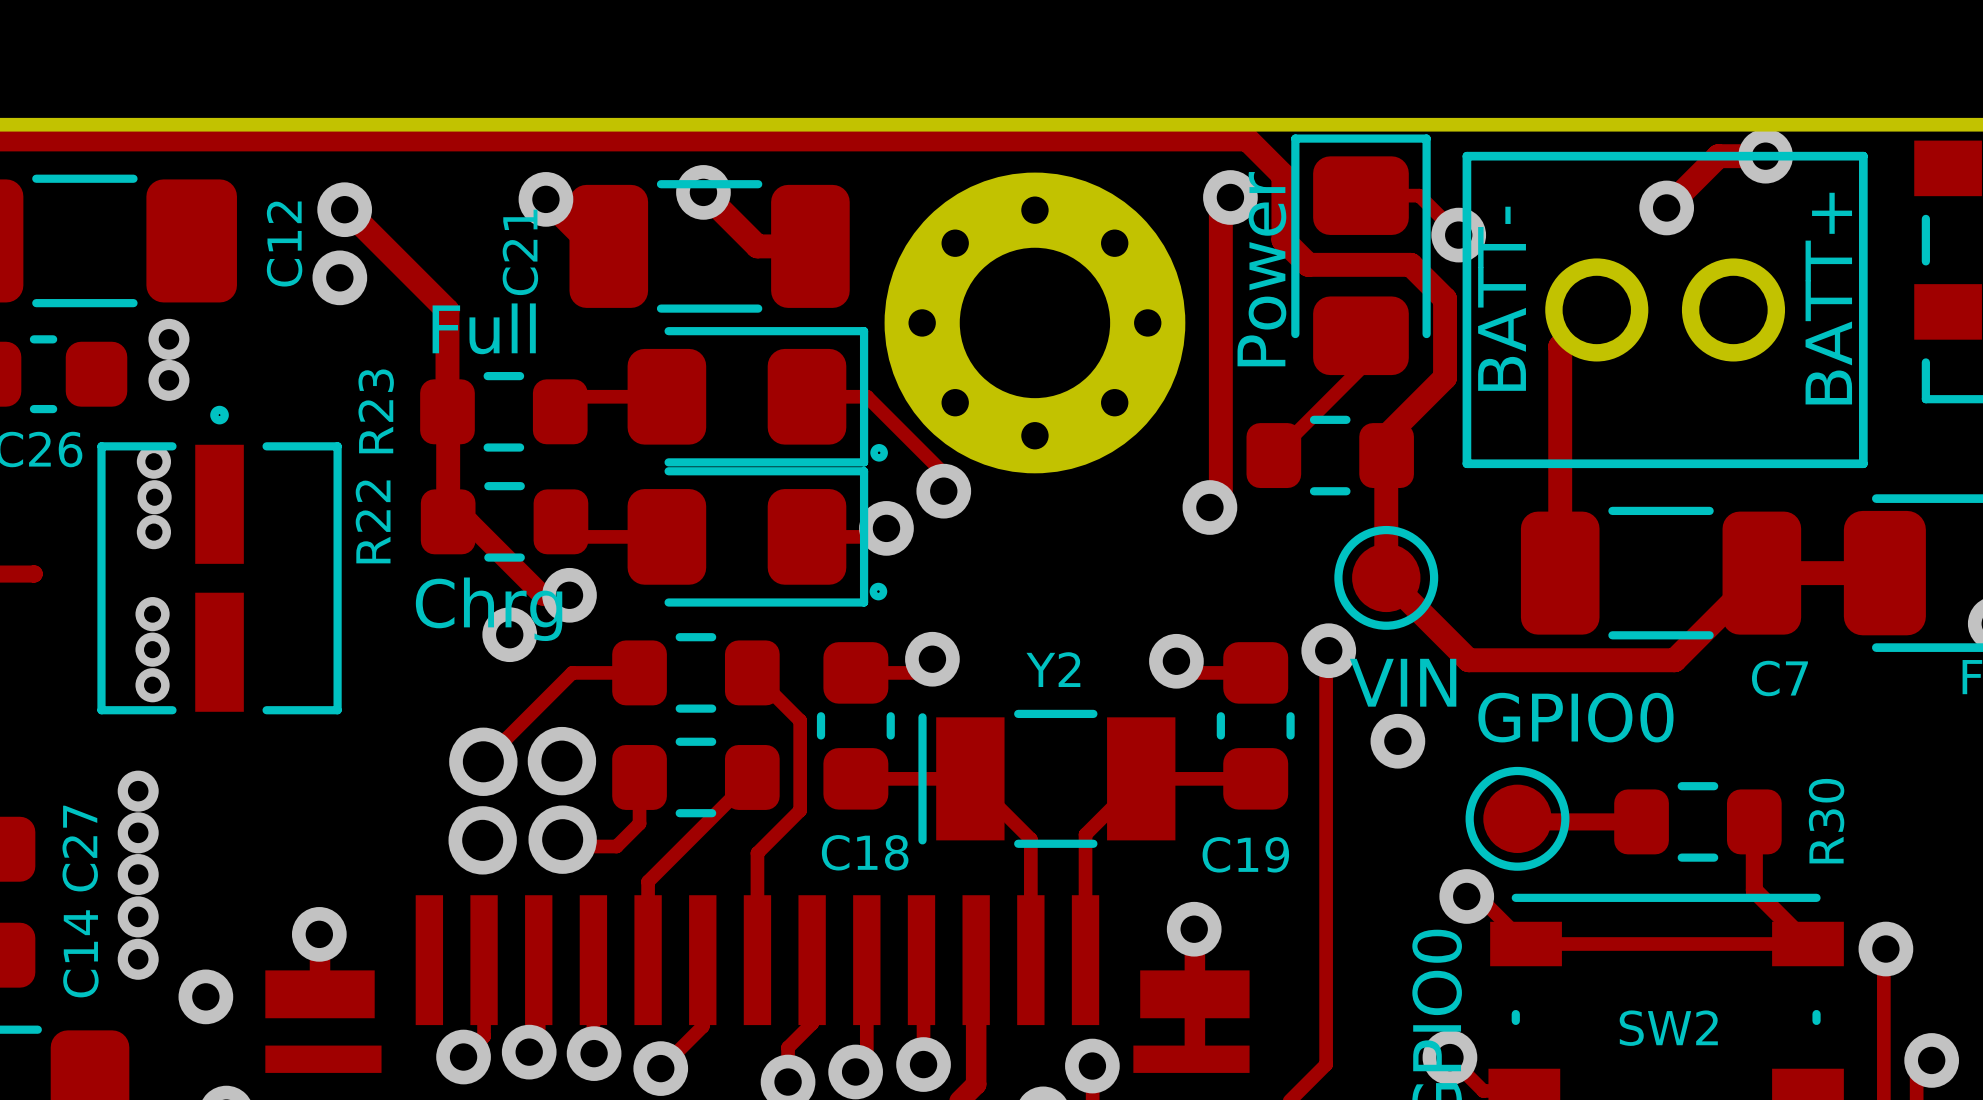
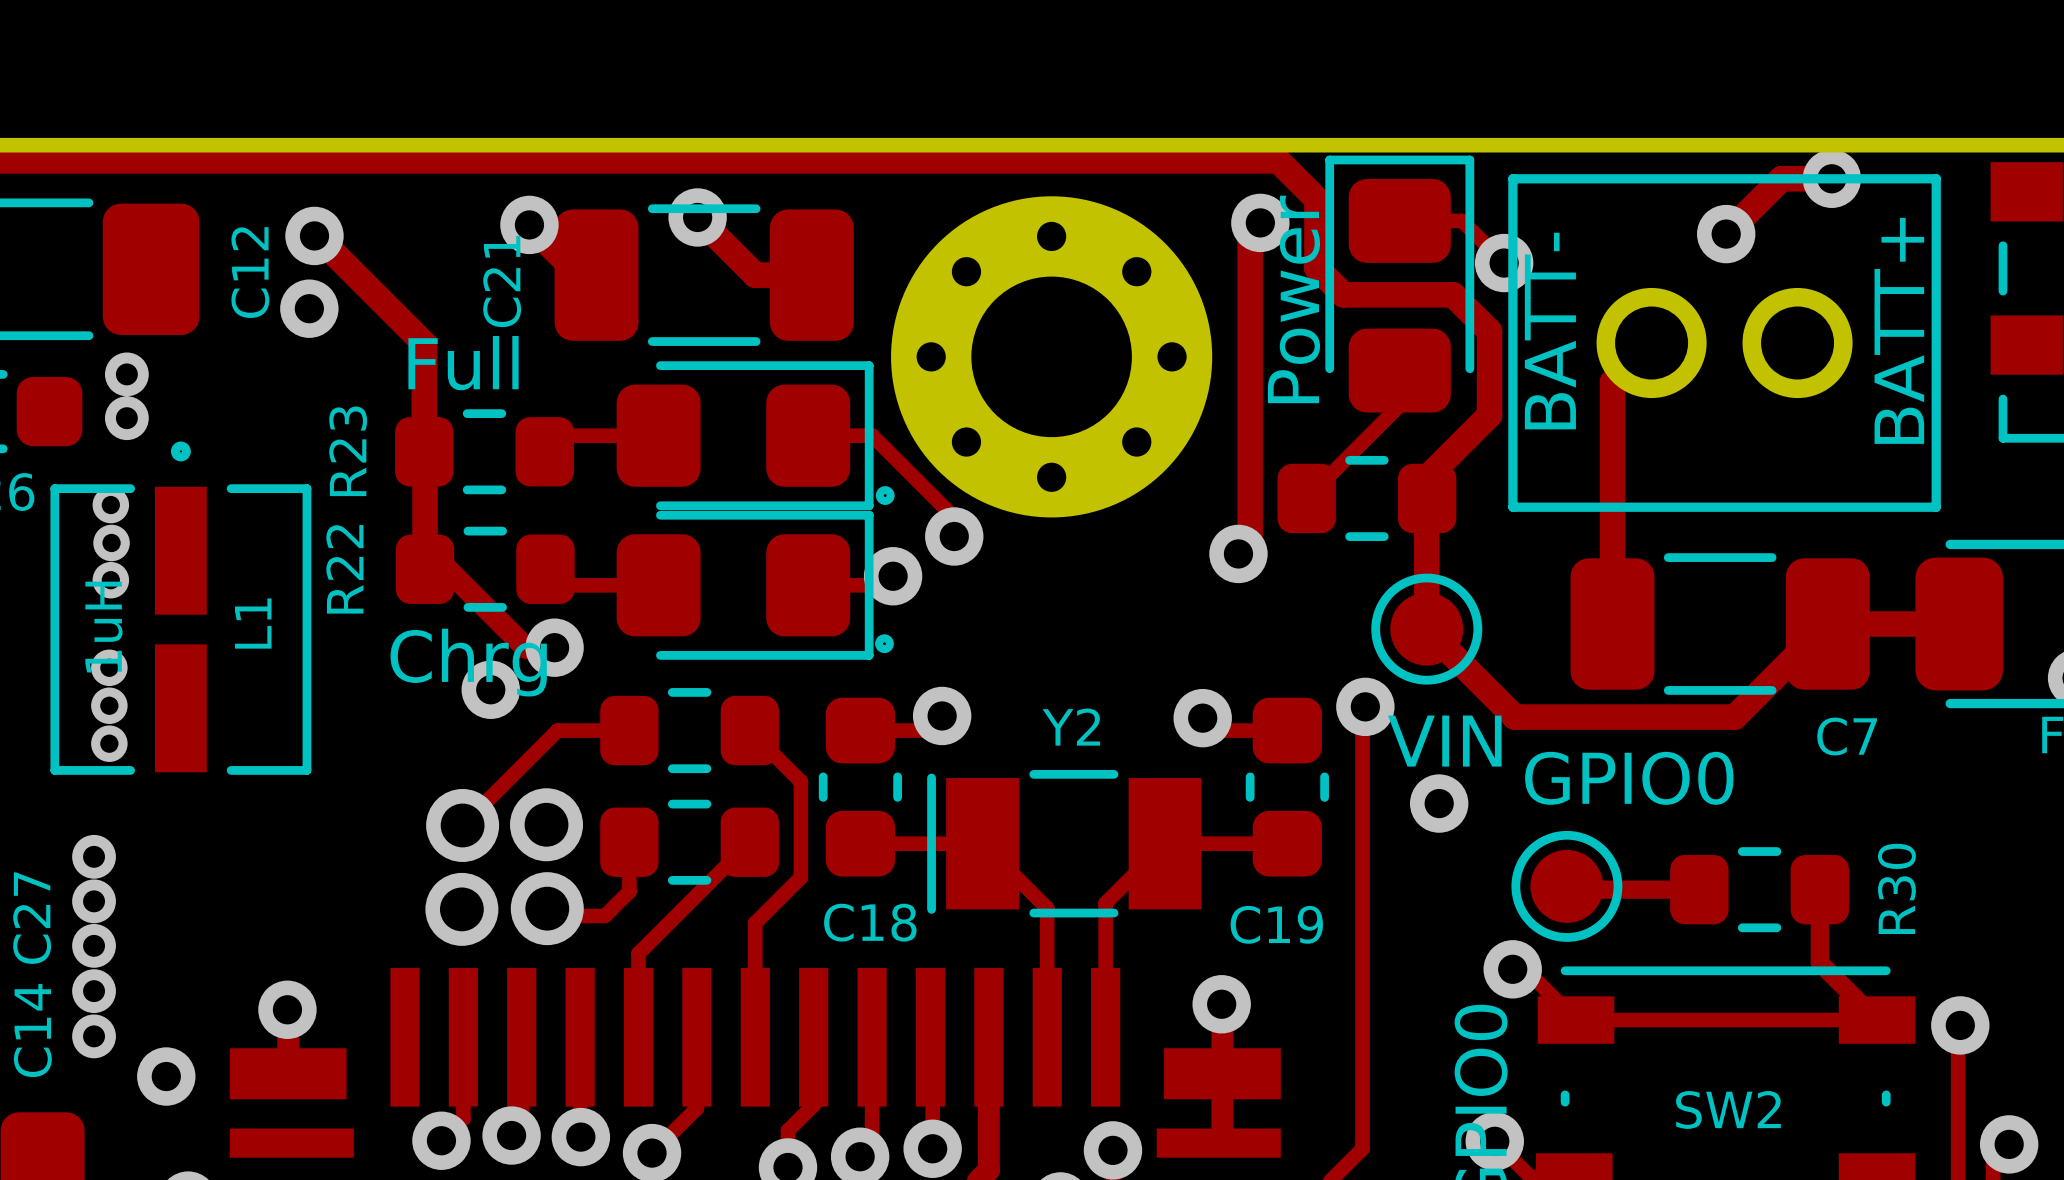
L1: none -> 1uH (180, 608)
part: (219, 560) -> none

